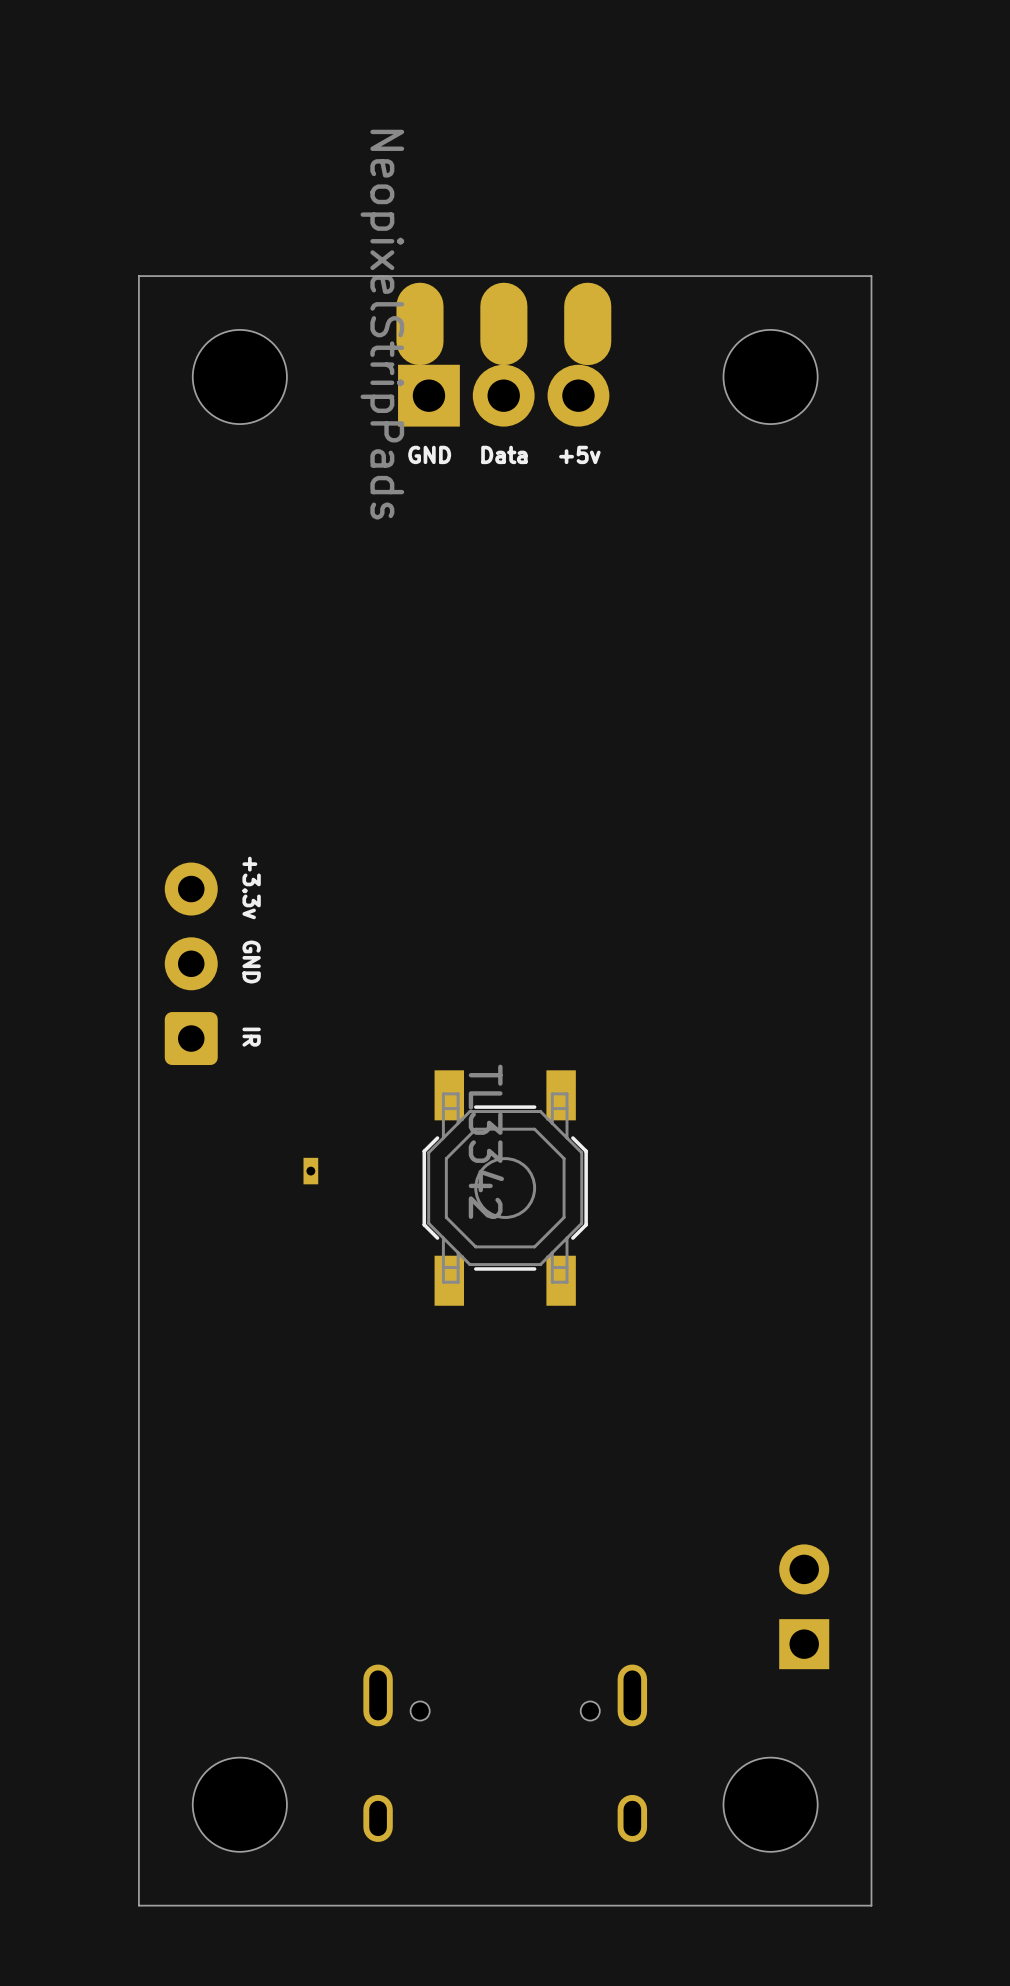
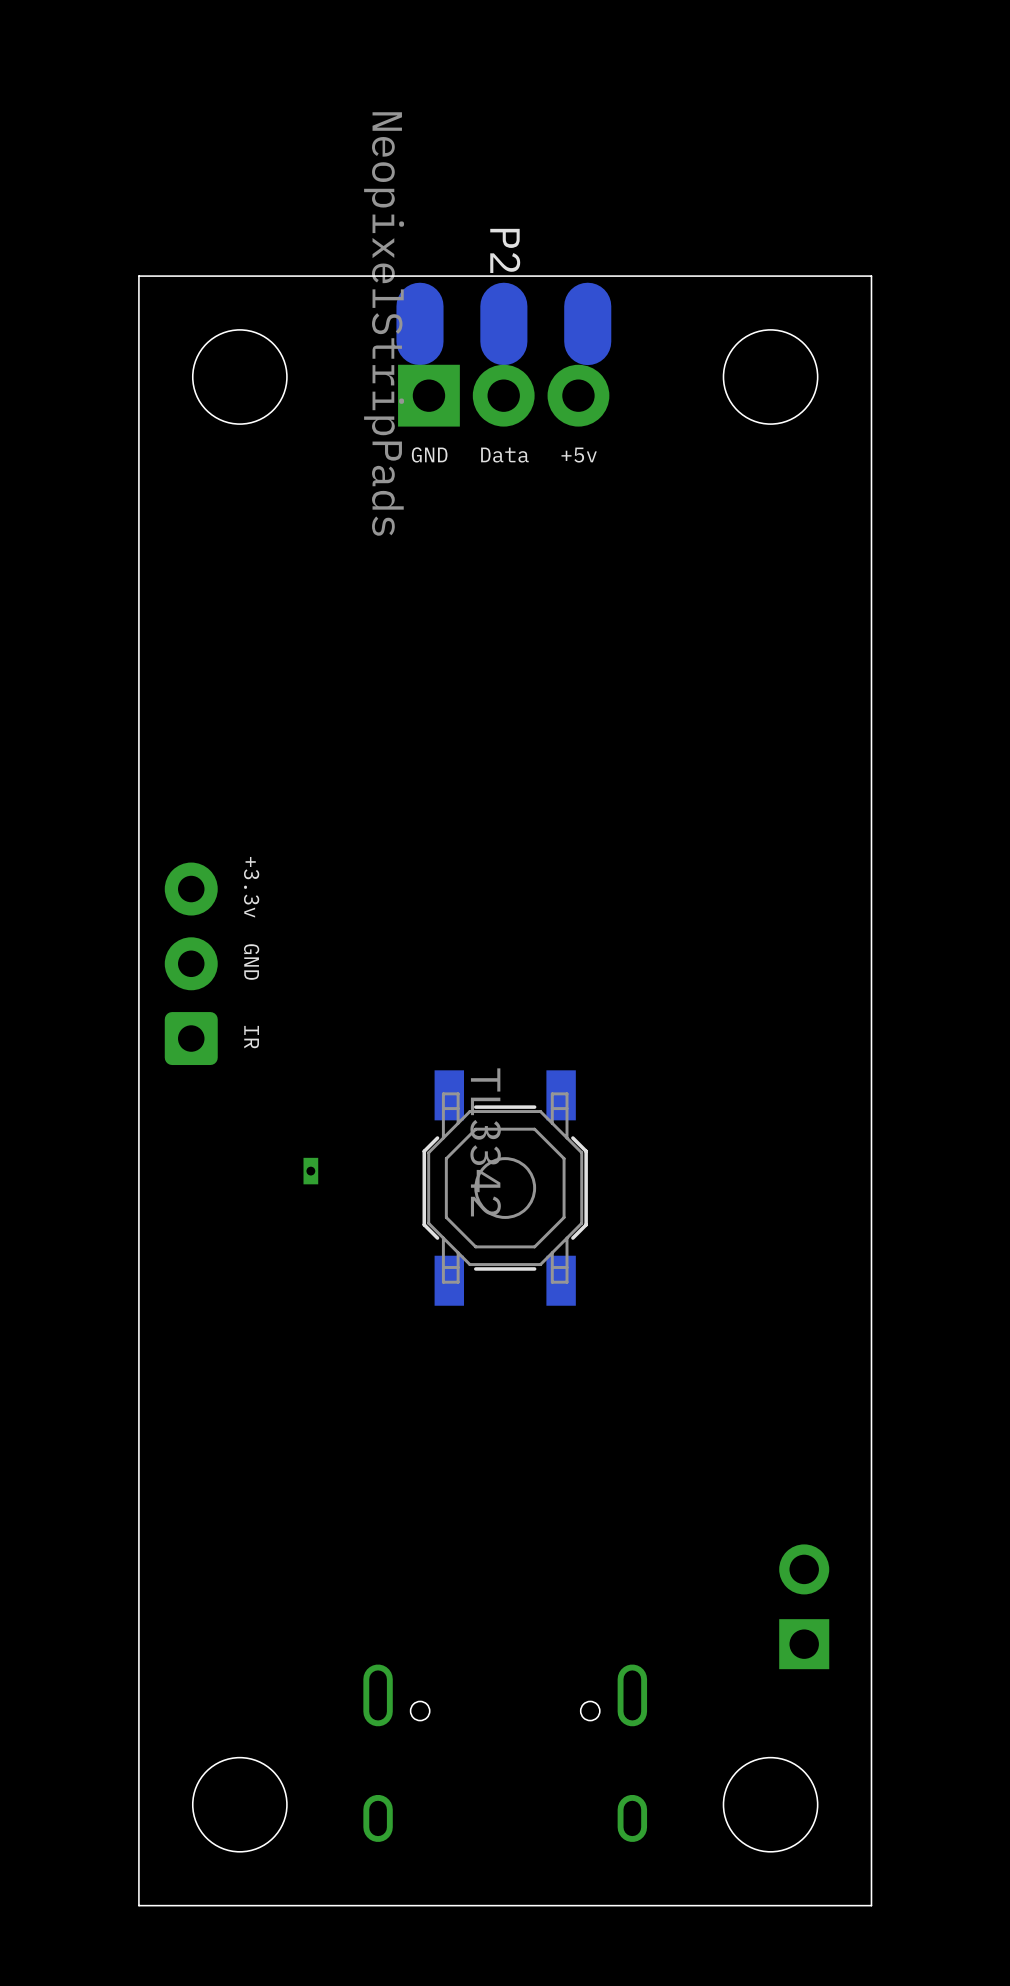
P2 name: none -> P2 (505, 250)

